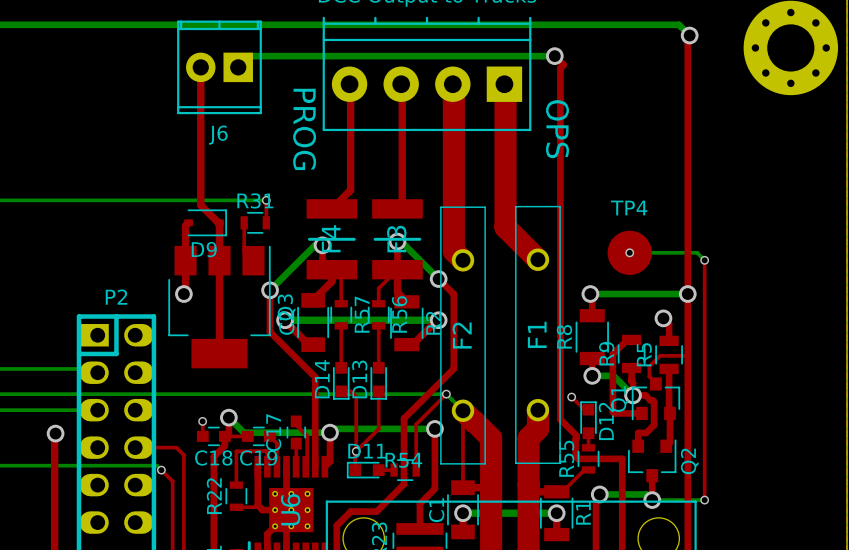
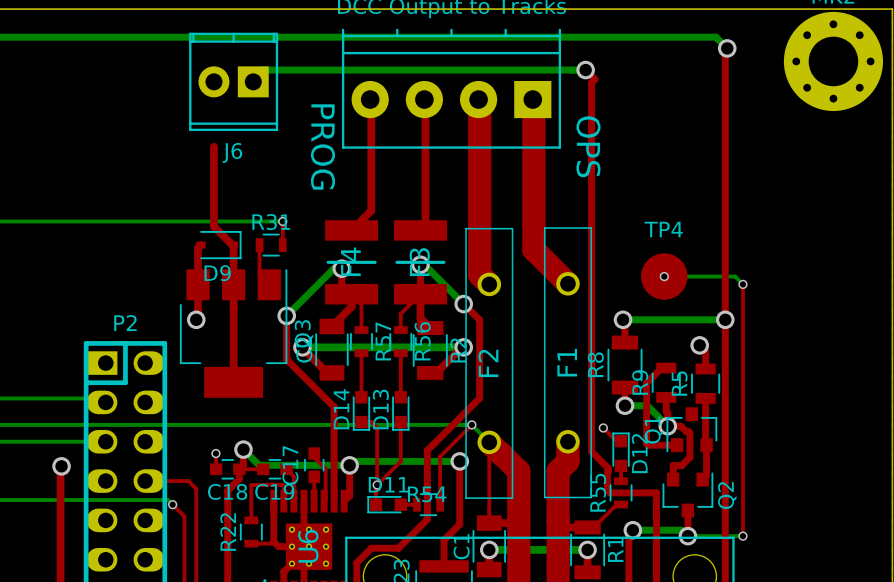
top track: (199, 68) (200, 129) -> none
top track: (687, 355) (660, 355) (649, 366) (649, 376) (655, 383) -> none

